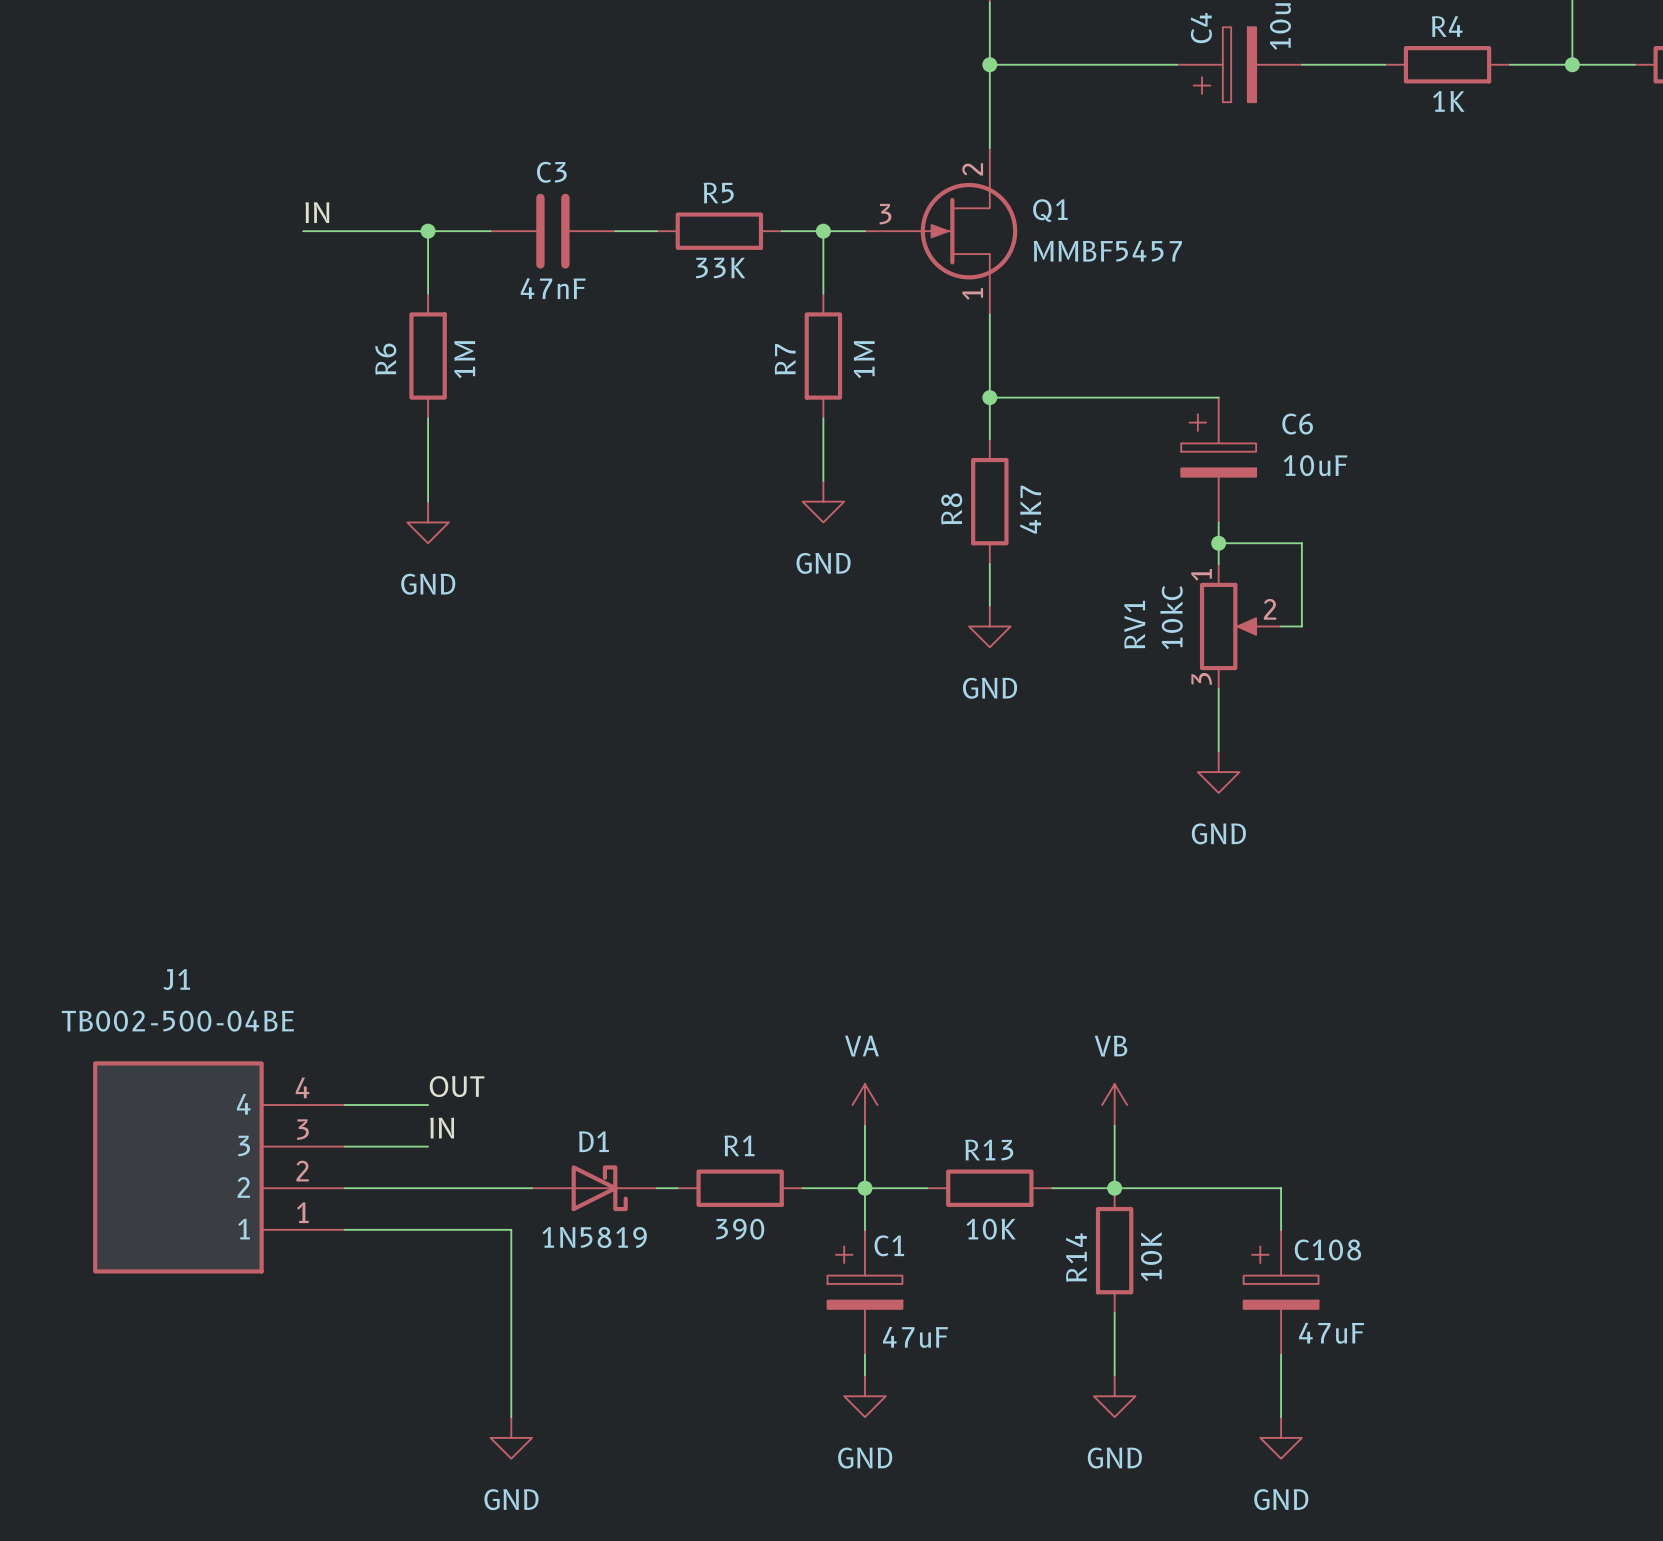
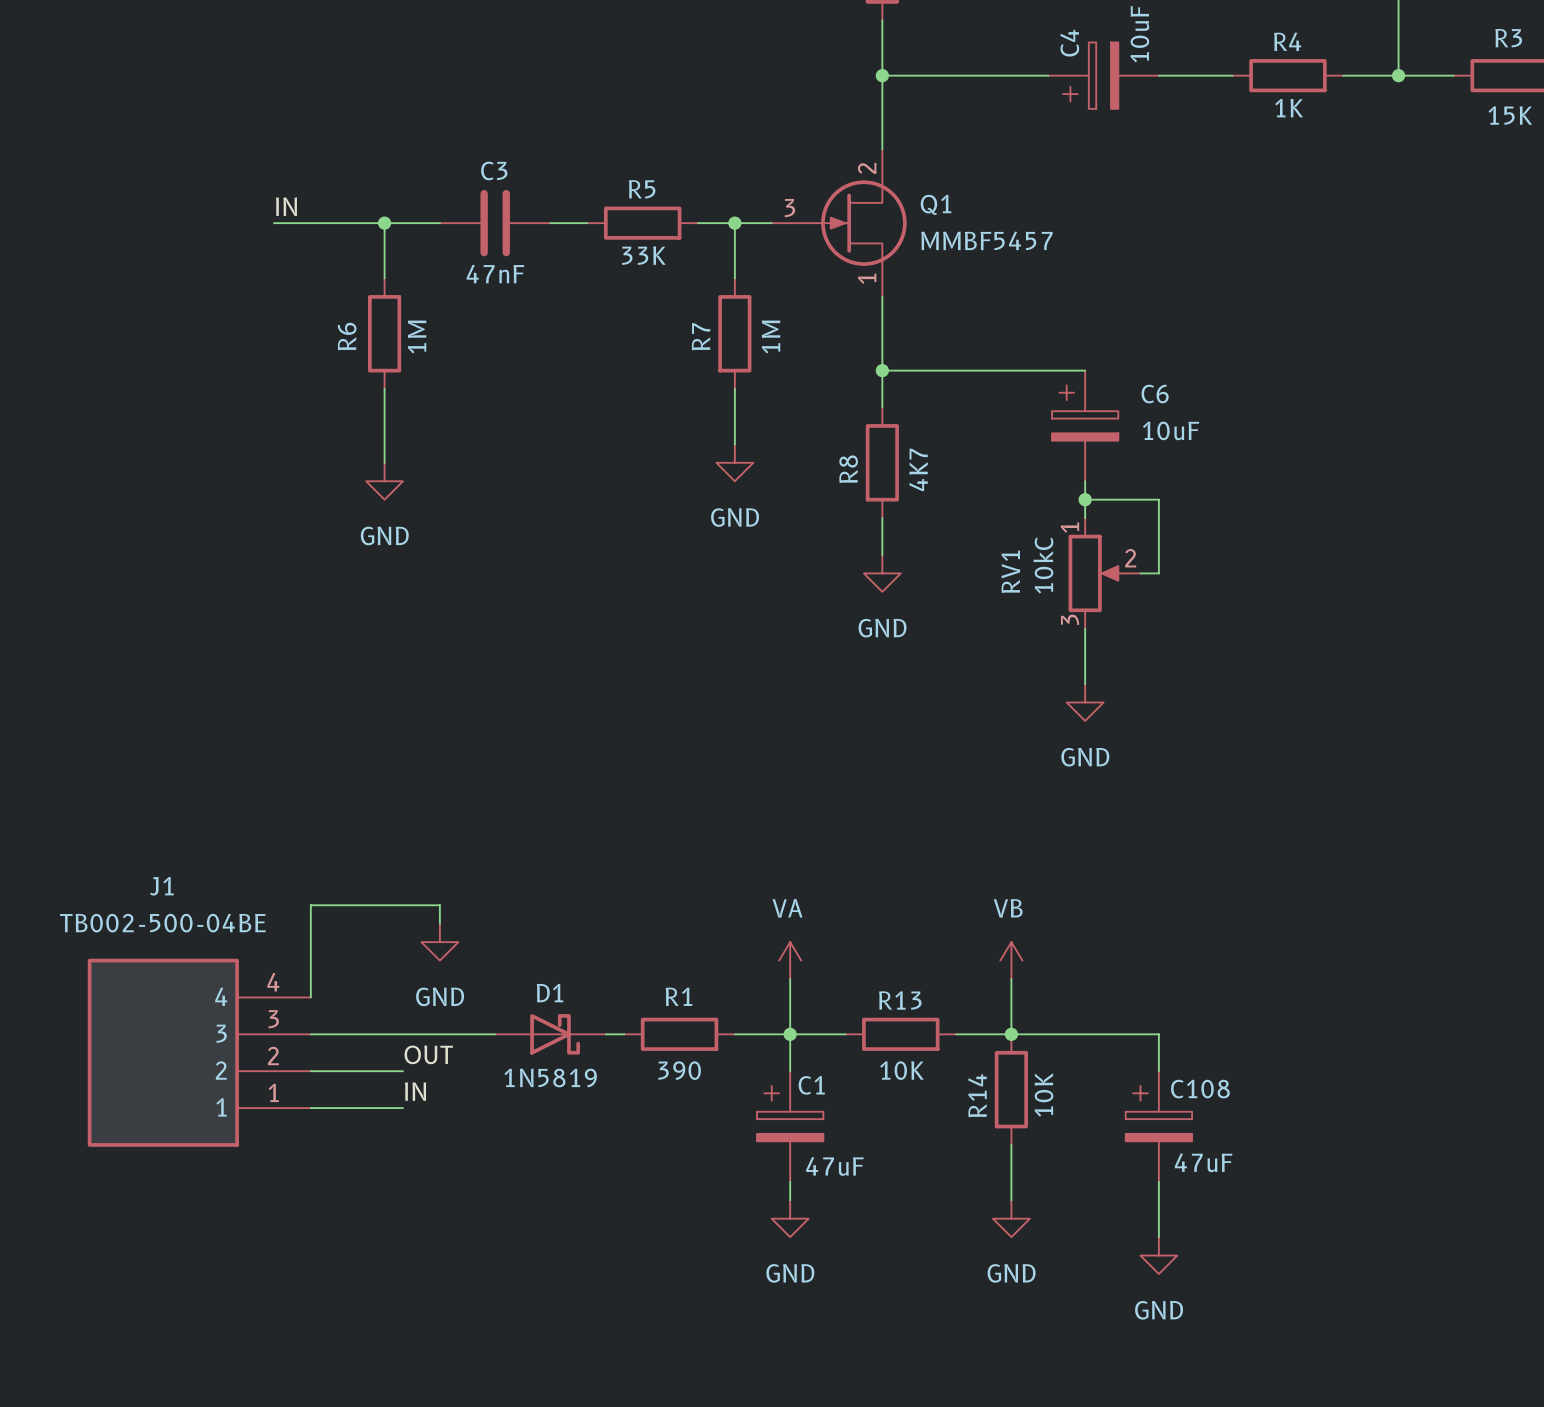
power symbol: none -> GND (439, 942)
label position: OUT (457, 1086) -> OUT (428, 1054)
wire: (344, 1105) (428, 1105) -> (310, 997) (310, 905) (439, 905) (439, 923)
power symbol position: VA (864, 1105) -> VA (790, 960)
power symbol position: VB (1114, 1105) -> VB (1011, 960)
wire: (864, 1125) (864, 1229) -> (790, 979) (790, 1071)
wire: (1114, 1125) (1114, 1188) -> (1011, 979) (1011, 1034)
label position: IN (442, 1128) -> IN (415, 1091)
wire: none -> (384, 1034) (495, 1034)
wire: (448, 1188) (532, 1188) -> none
D1 position: (594, 1188) -> (550, 1034)
wire: (656, 1188) (677, 1188) -> (605, 1034) (624, 1034)
R1 position: (740, 1188) -> (679, 1034)
wire: (802, 1188) (927, 1188) -> (734, 1034) (845, 1034)
junction position: (864, 1188) -> (790, 1034)
R13 position: (989, 1188) -> (900, 1034)
wire: (1052, 1188) (1281, 1188) (1281, 1229) -> (956, 1034) (1158, 1034) (1158, 1071)
junction position: (1114, 1188) -> (1011, 1034)
wire: (448, 1229) (511, 1229) (511, 1417) -> none
R14 position: (1114, 1250) -> (1011, 1089)
C1 position: (864, 1292) -> (790, 1126)
C108 position: (1281, 1292) -> (1158, 1126)
wire: (1114, 1313) (1114, 1375) -> (1011, 1144) (1011, 1200)
wire: (864, 1354) (864, 1375) -> (790, 1181) (790, 1200)
wire: (1281, 1354) (1281, 1417) -> (1158, 1181) (1158, 1237)
power symbol position: GND (864, 1396) -> GND (790, 1218)
power symbol position: GND (1114, 1396) -> GND (1011, 1218)
power symbol: GND (511, 1437) -> none
power symbol position: GND (1281, 1437) -> GND (1158, 1255)

